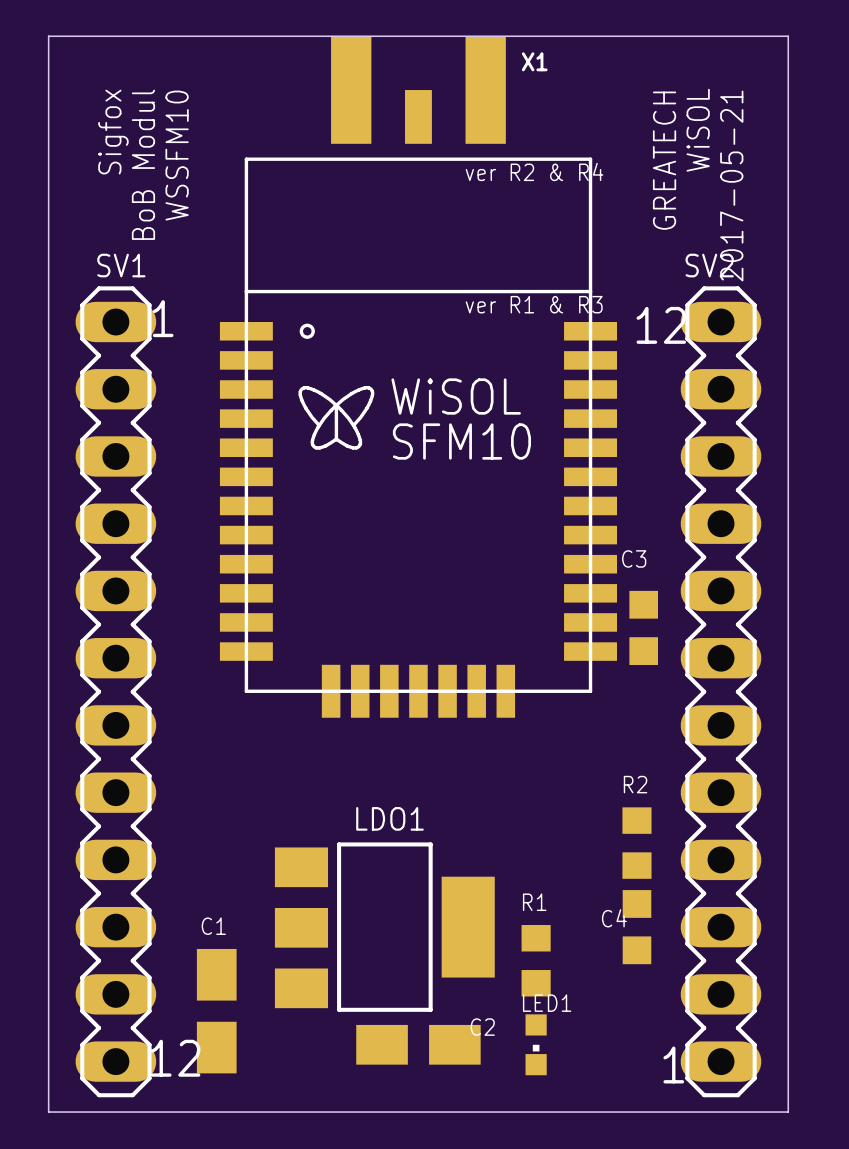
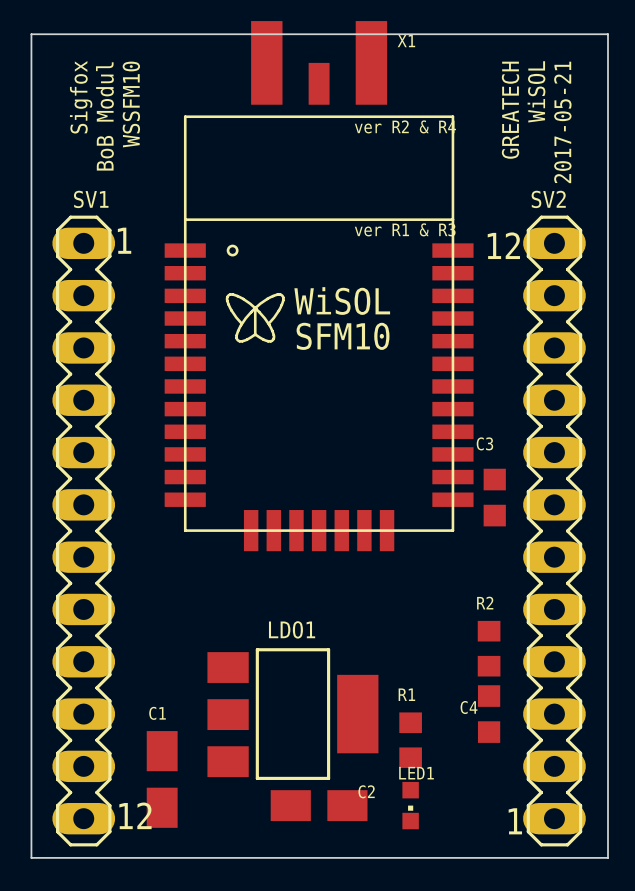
board edge: (48, 53) (48, 36) (788, 36) (788, 1112) -> (31, 34) (608, 34) (606, 857)
C3 position: (643, 627) -> (494, 497)

